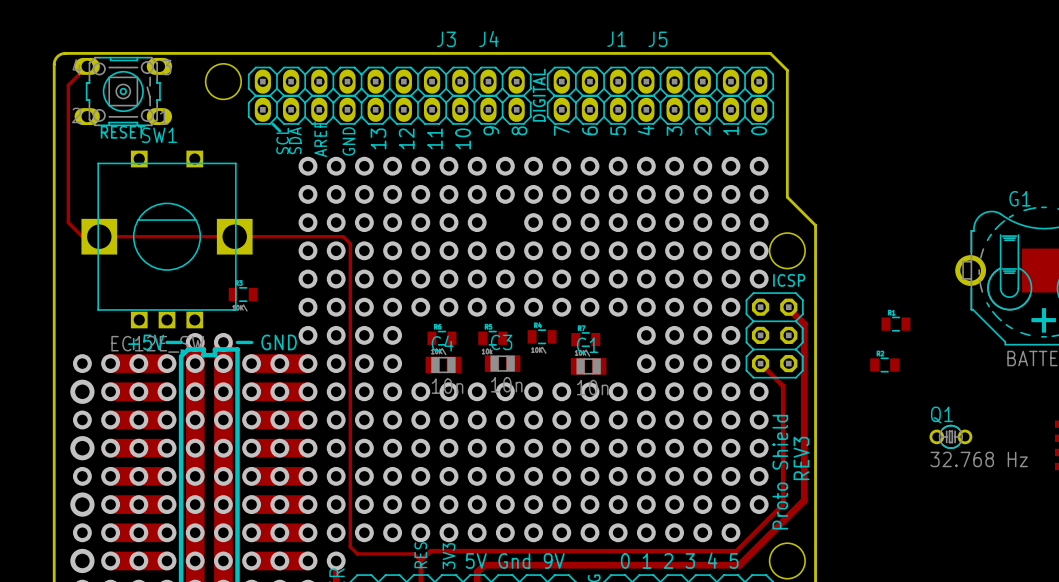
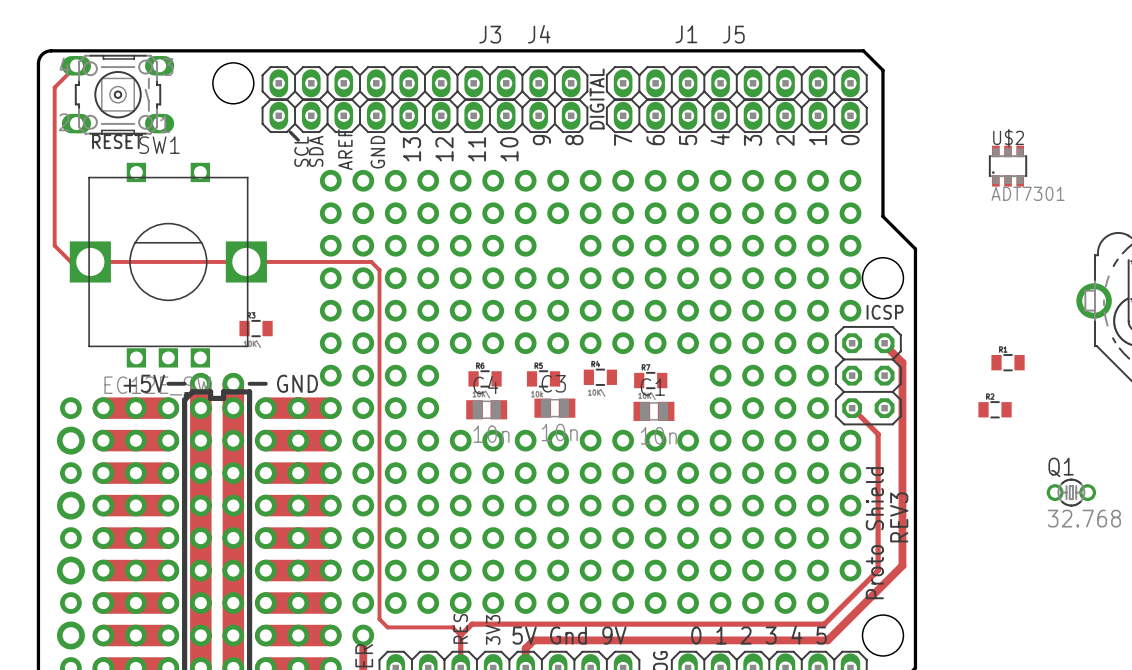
U$2: none -> ADT7301 (1008, 166)

